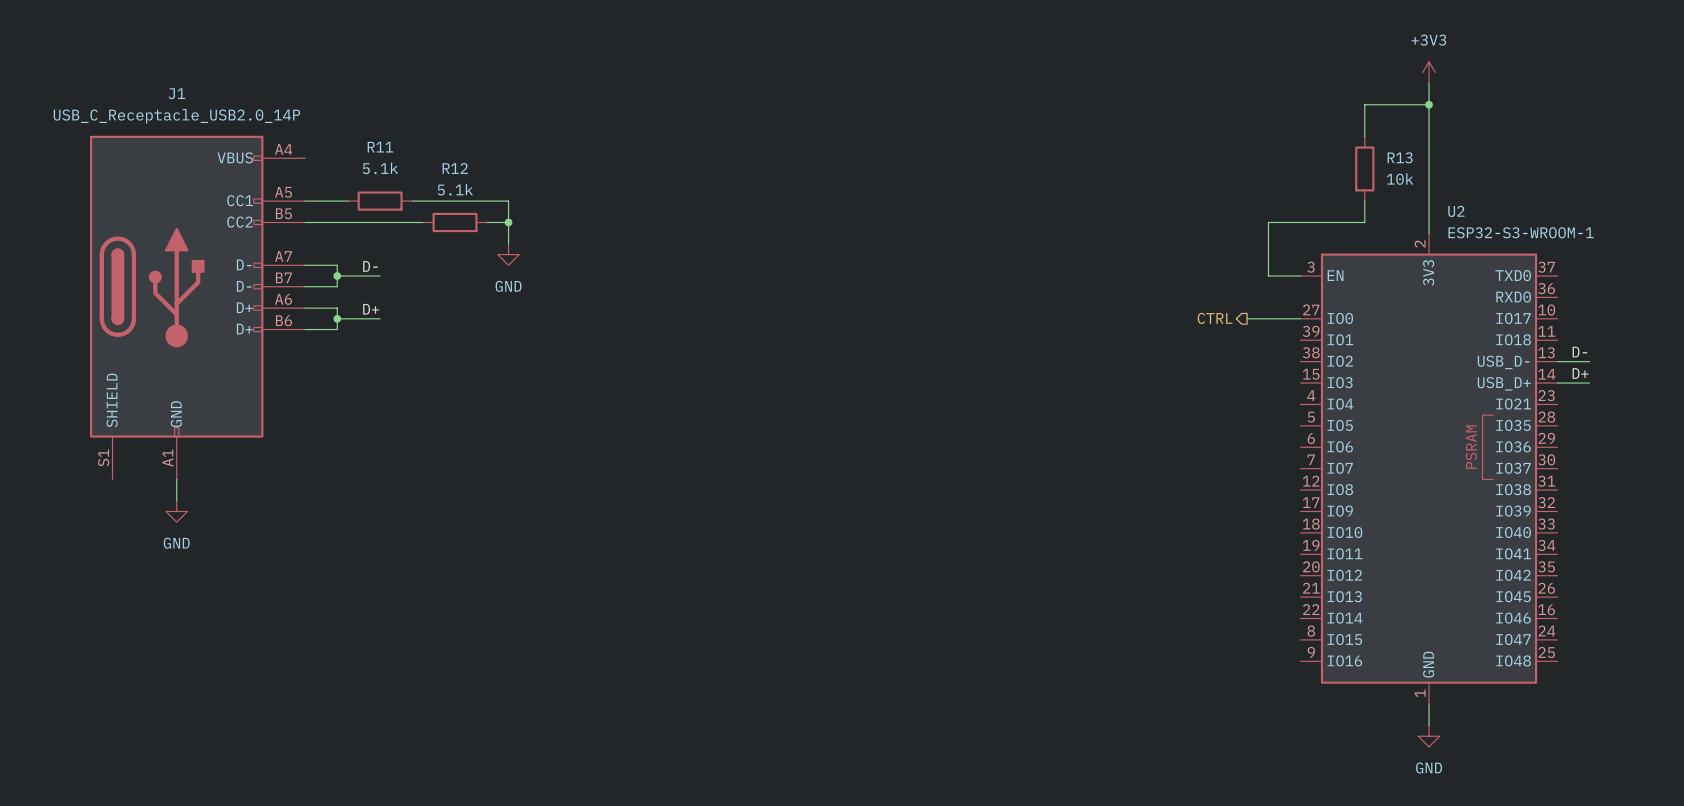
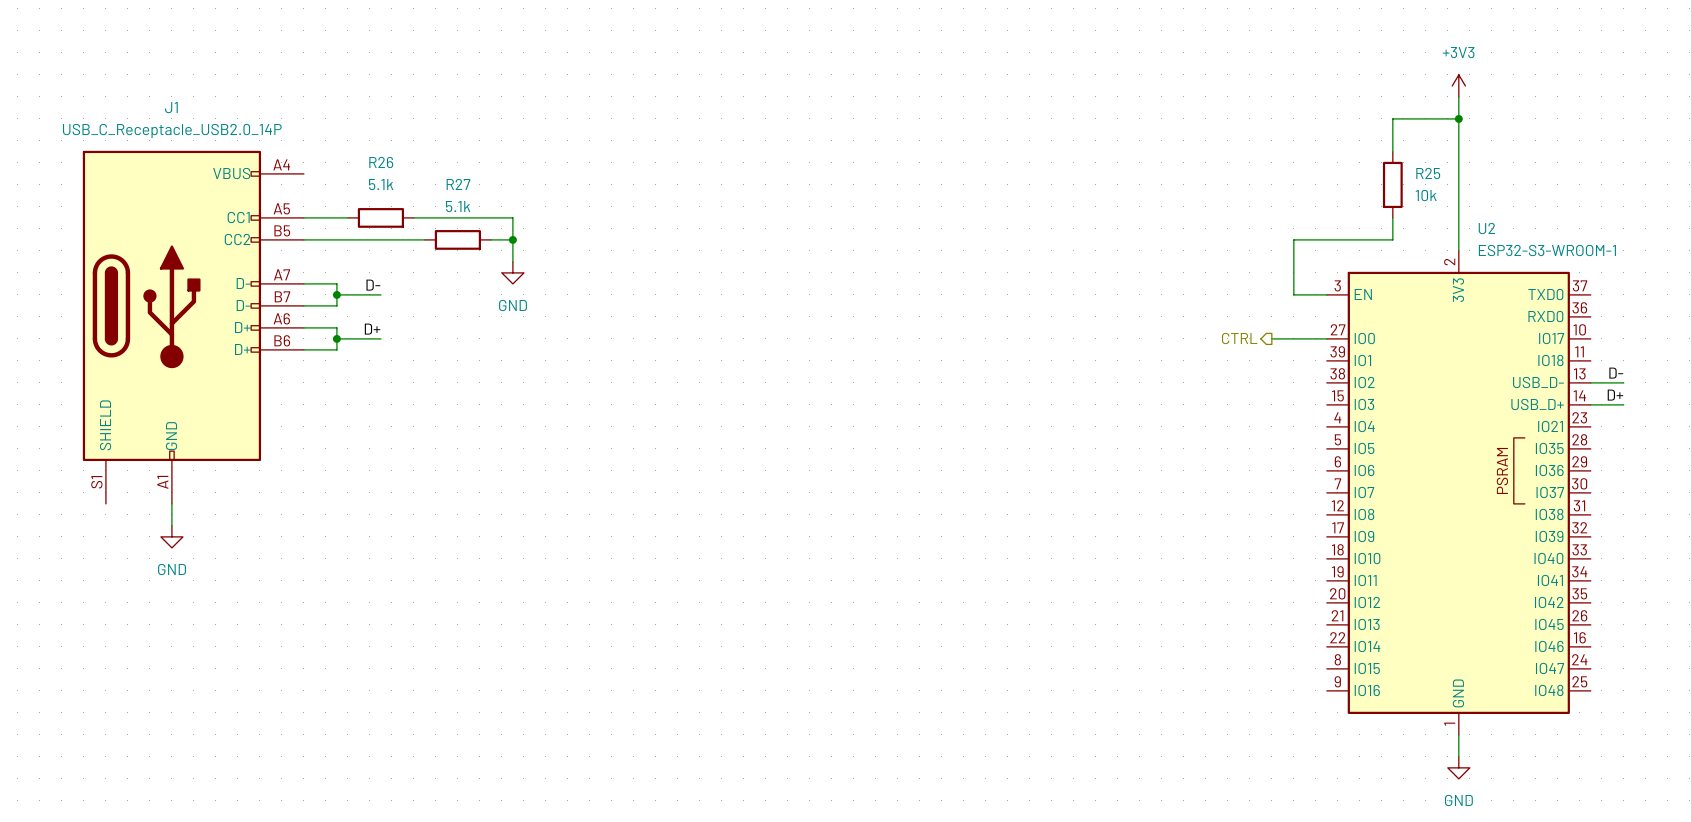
R11 name: R11 (380, 147) -> R26 (381, 162)
R13 name: R13 (1400, 157) -> R25 (1428, 173)
R12 name: R12 (455, 168) -> R27 (458, 184)

